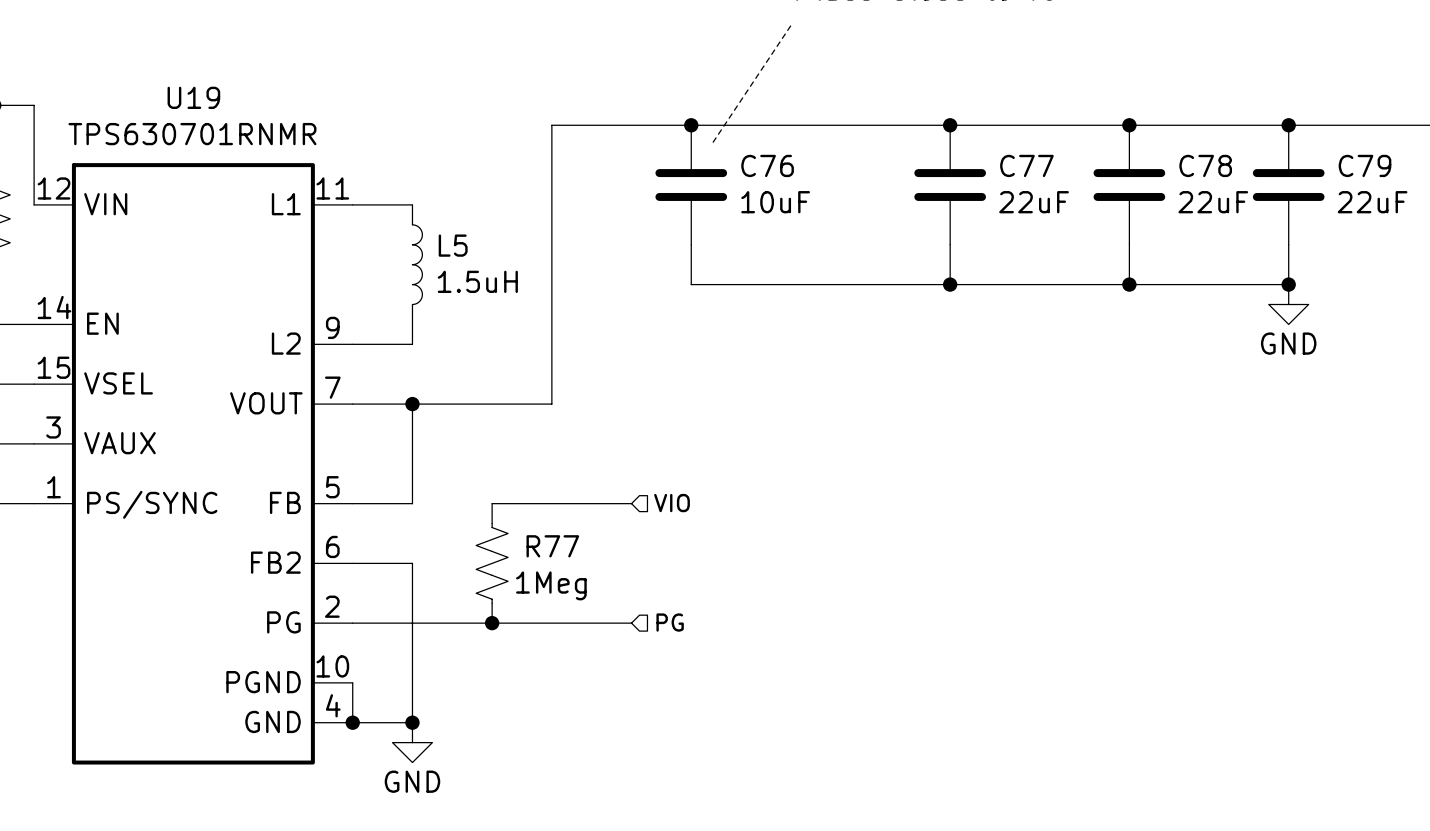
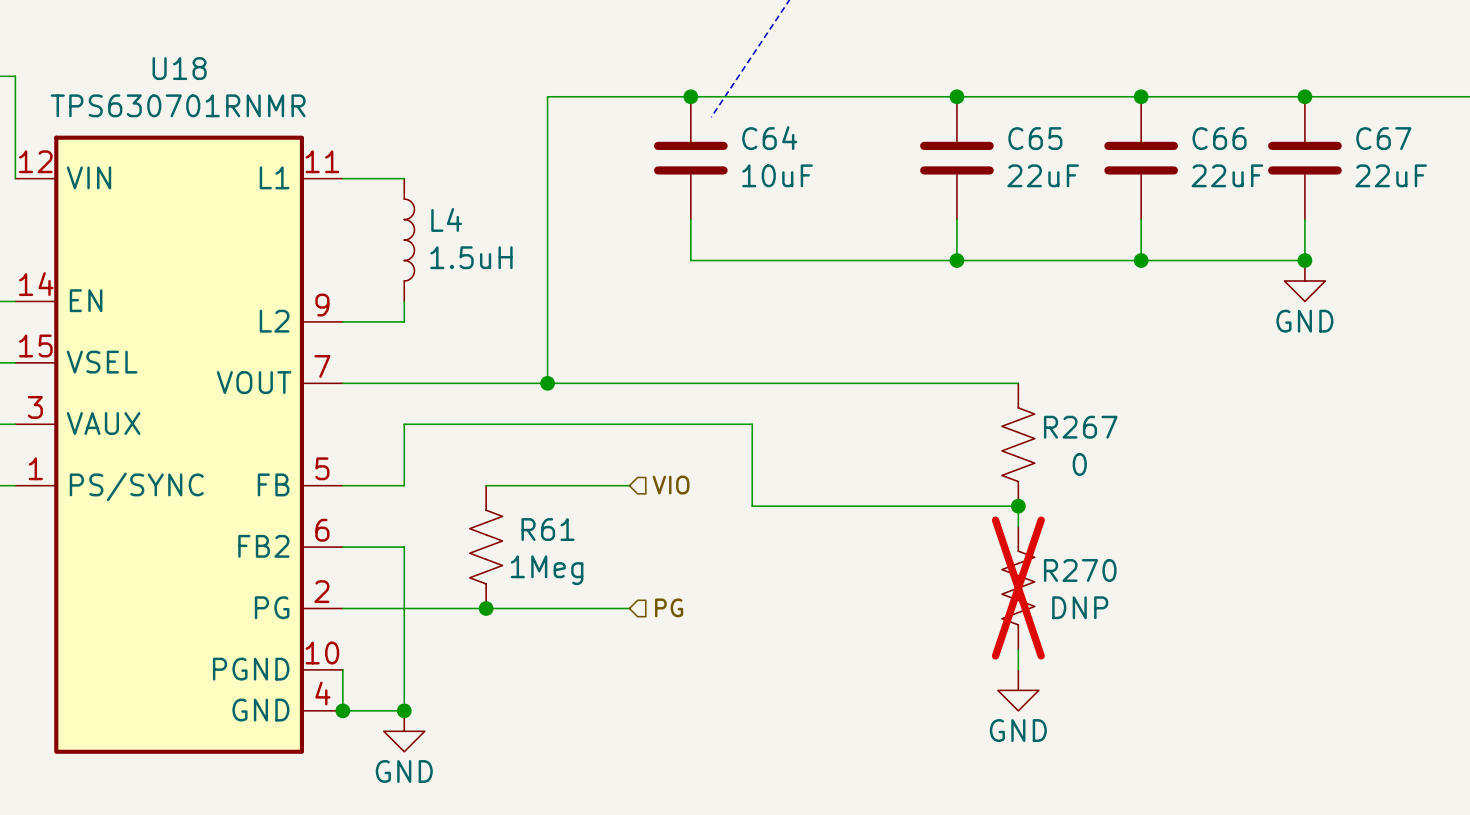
U19 name: U19 (193, 97) -> U18 (179, 68)
C76 name: C76 (767, 165) -> C64 (769, 138)
C77 name: C77 (1026, 165) -> C65 (1035, 138)
C78 name: C78 (1205, 165) -> C66 (1219, 138)
C79 name: C79 (1365, 165) -> C67 (1383, 138)
L5 name: L5 (453, 245) -> L4 (446, 219)
wire: (412, 404) (412, 443) -> (1018, 526) (1018, 506) (752, 506) (752, 424) (404, 424)
junction: (412, 404) -> none
wire: none -> (547, 383) (1018, 383)
junction: none -> (547, 383)
R267: none -> 0 (1018, 444)
junction: none -> (1018, 506)
R77 name: R77 (552, 546) -> R61 (548, 529)
R270: none -> DNP (1018, 588)
wire: none -> (1018, 649) (1018, 669)
power symbol: none -> GND (1018, 690)

